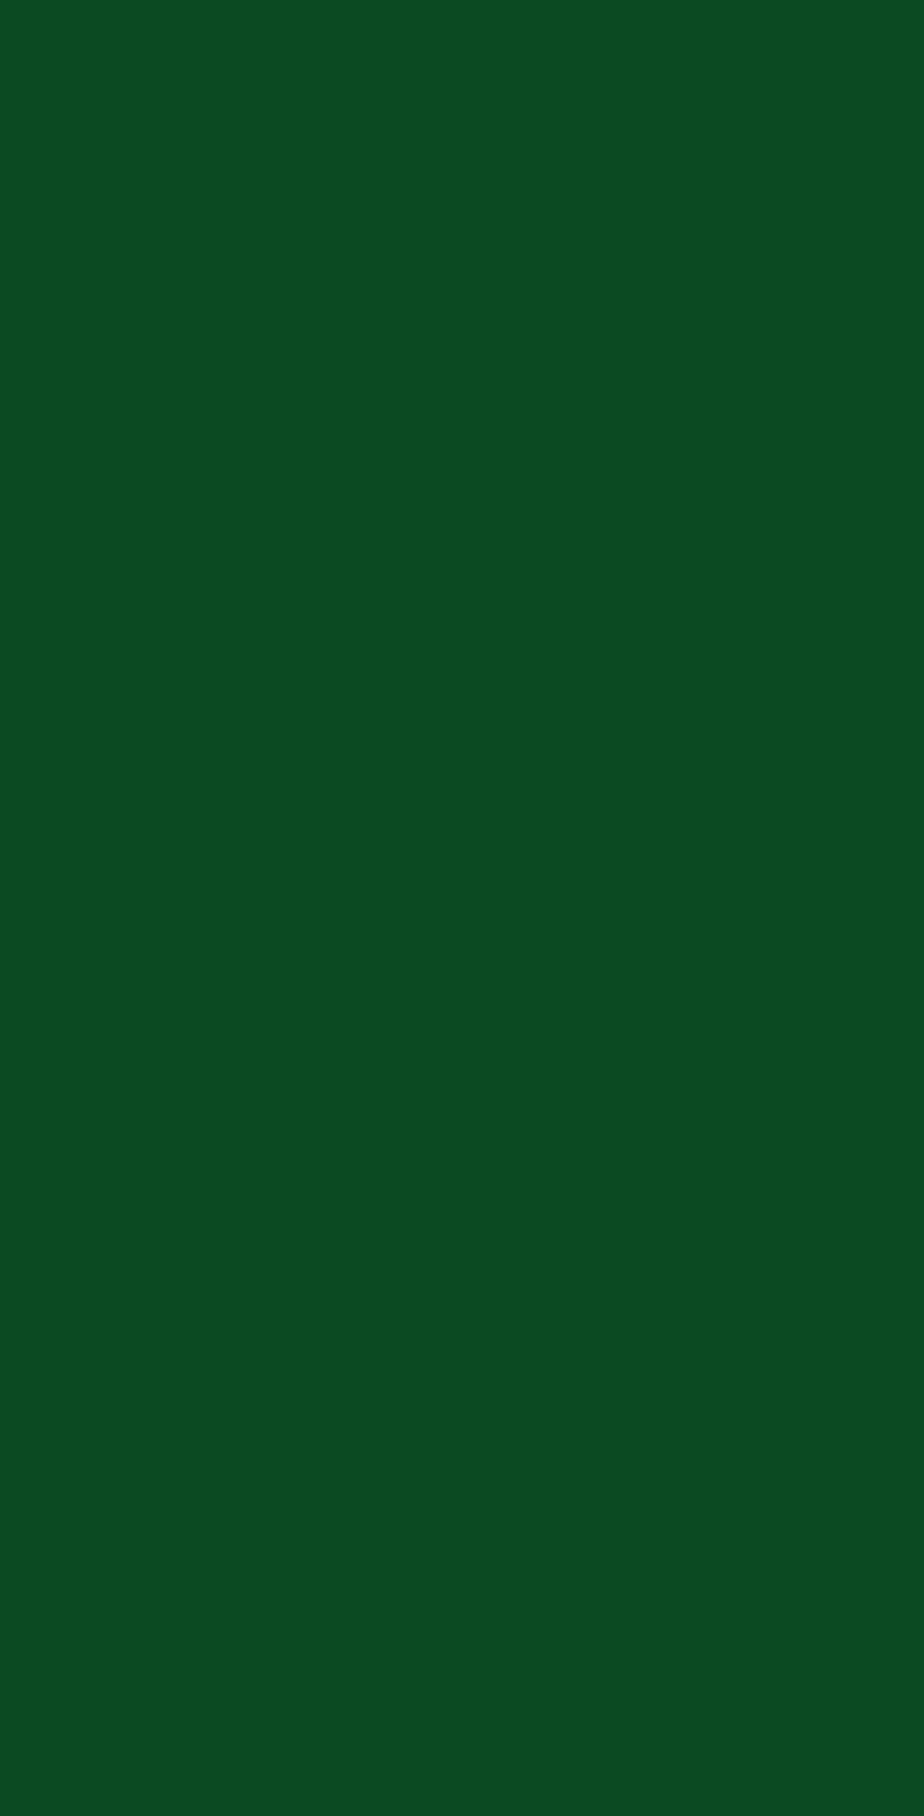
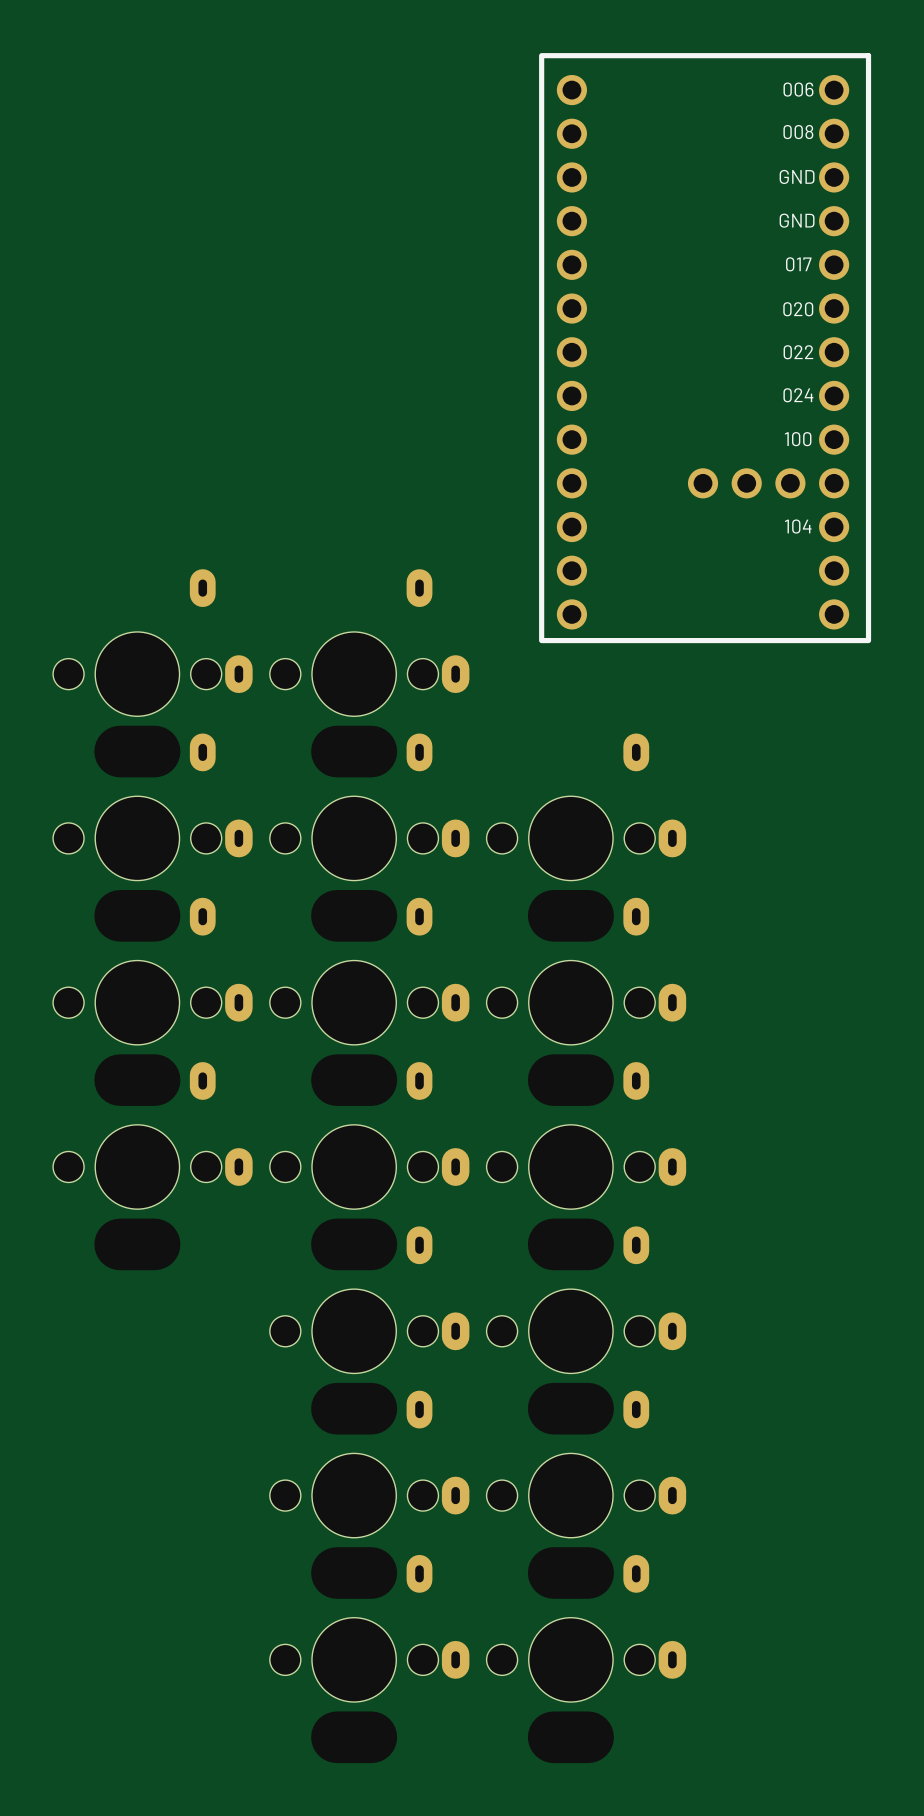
part: none -> (705, 348)
part: none -> (152, 673)
part: none -> (369, 673)
part: none -> (152, 837)
part: none -> (369, 837)
part: none -> (586, 837)
part: none -> (152, 1001)
part: none -> (369, 1001)
part: none -> (586, 1001)
part: none -> (152, 1166)
part: none -> (369, 1166)
part: none -> (586, 1166)
part: none -> (369, 1330)
part: none -> (586, 1330)
part: none -> (369, 1494)
part: none -> (586, 1494)
part: none -> (369, 1659)
part: none -> (586, 1659)

